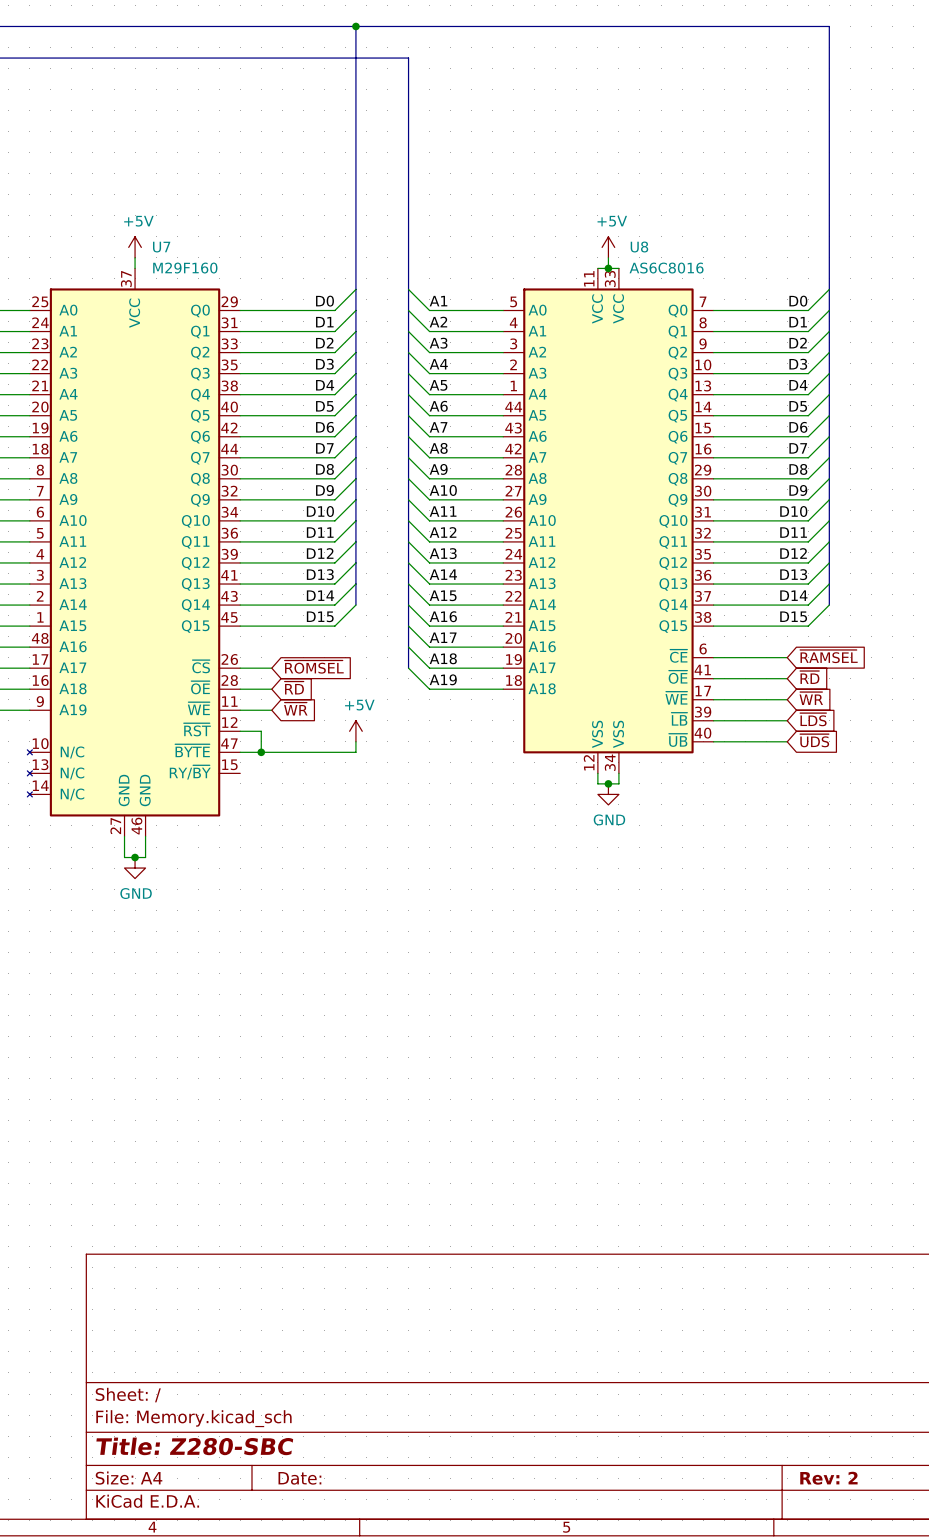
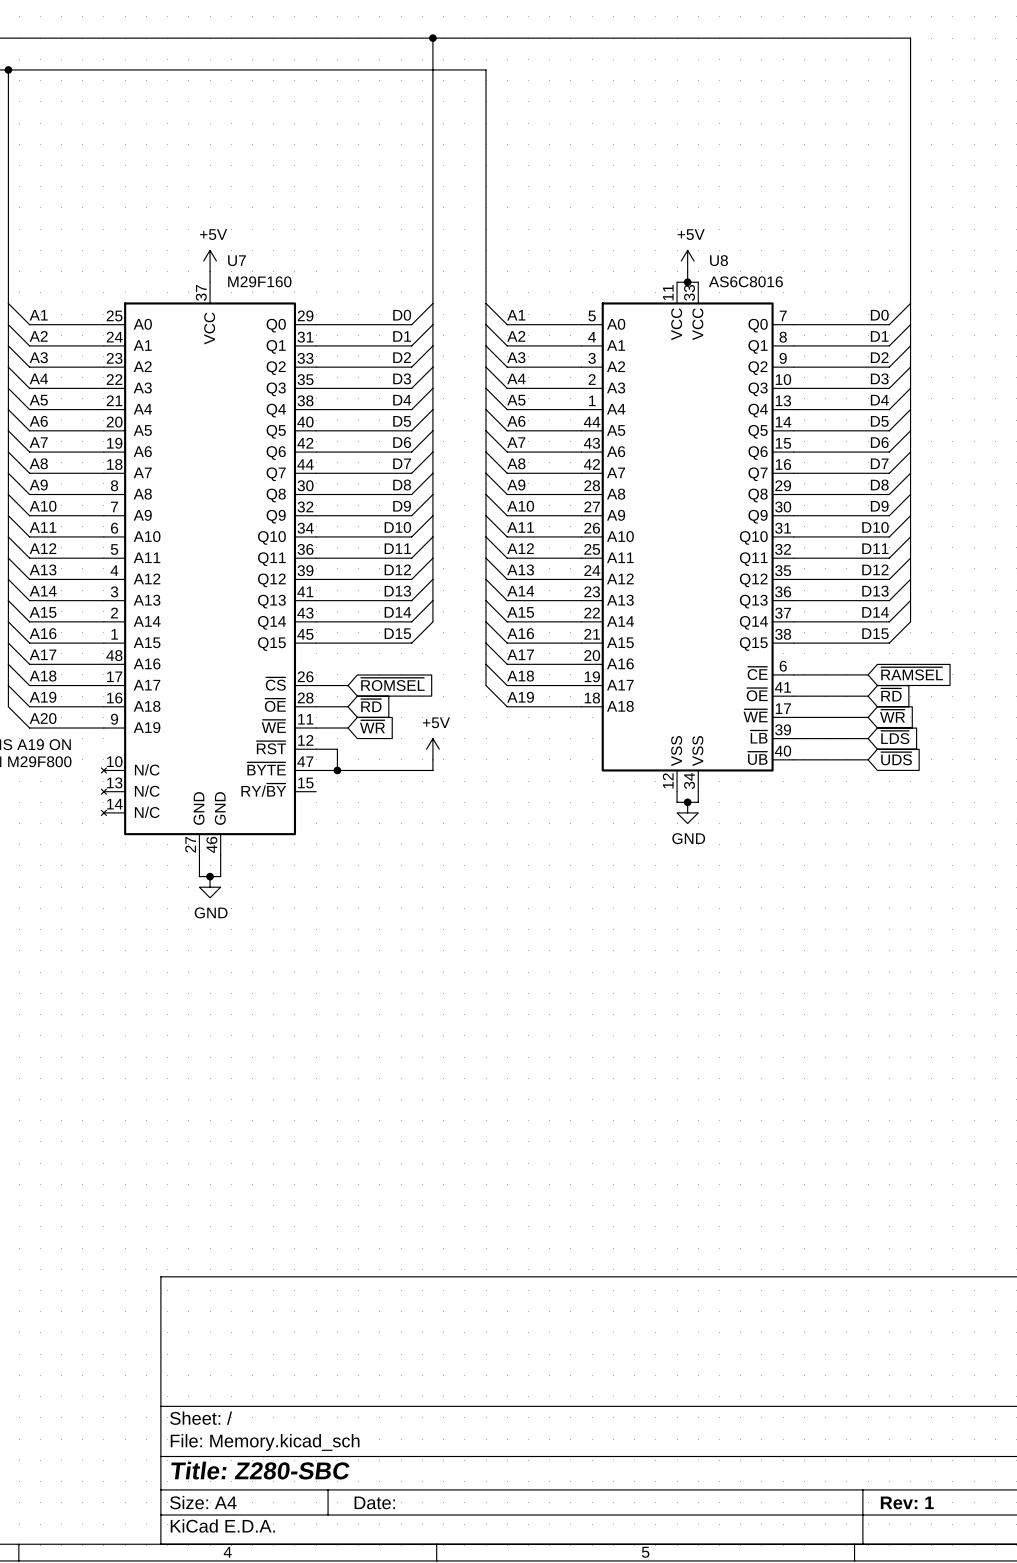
title block: Rev: 2 (828, 1478) -> Rev: 1 (907, 1502)

